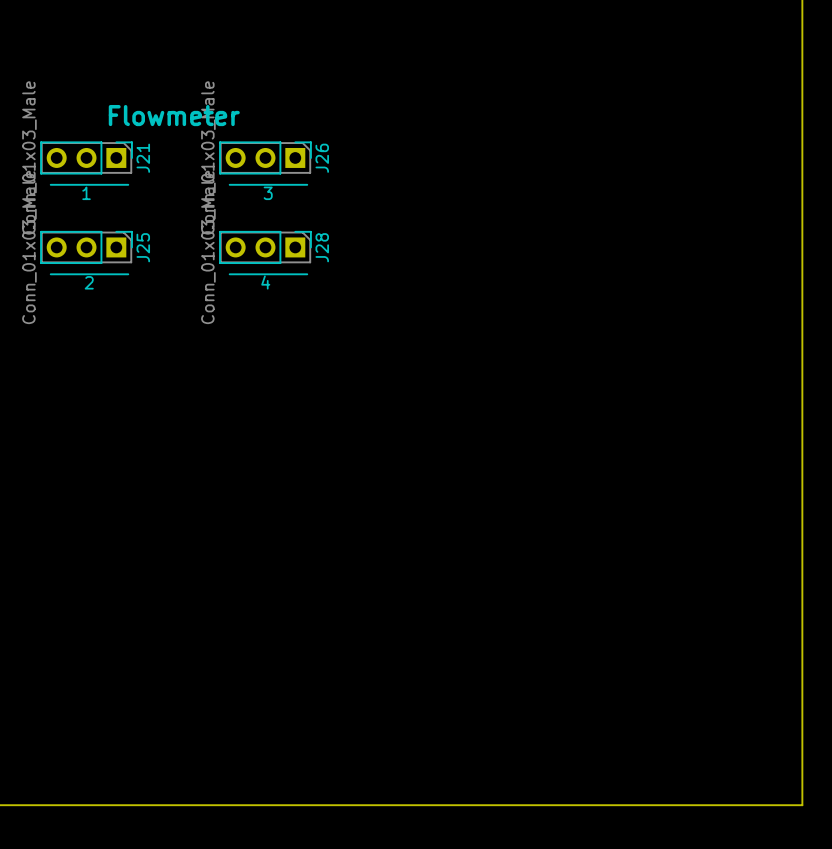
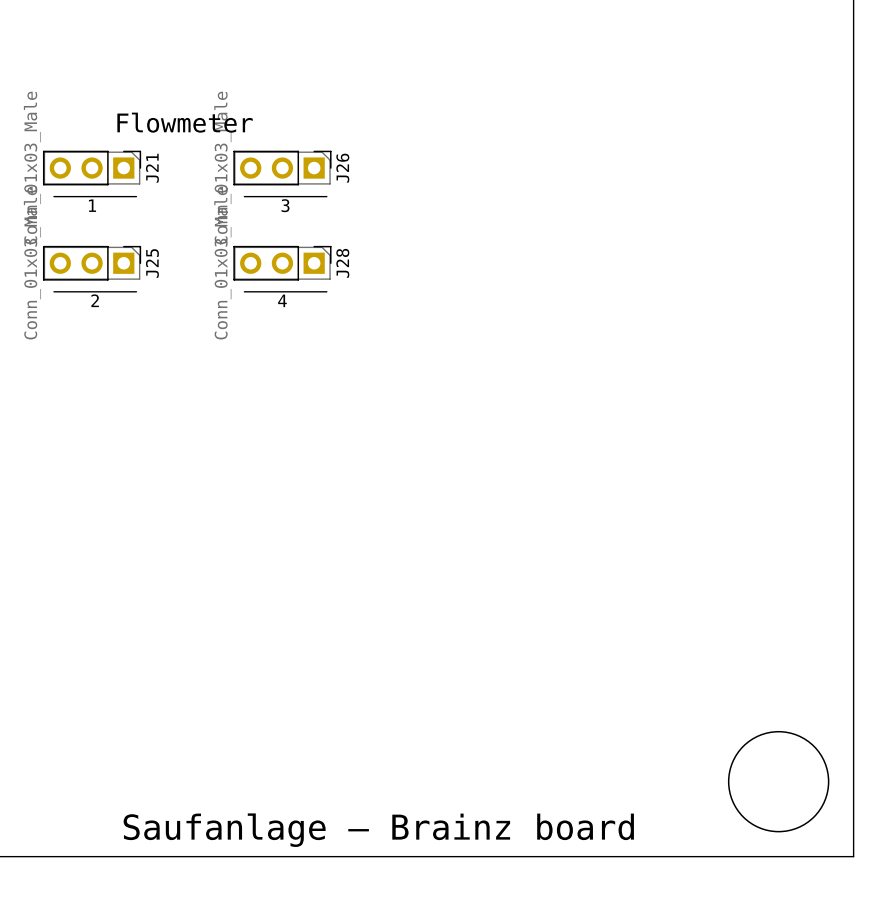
round board edge: none -> [727, 730, 830, 833]
text: none -> Saufanlage – Brainz board (378, 830)

